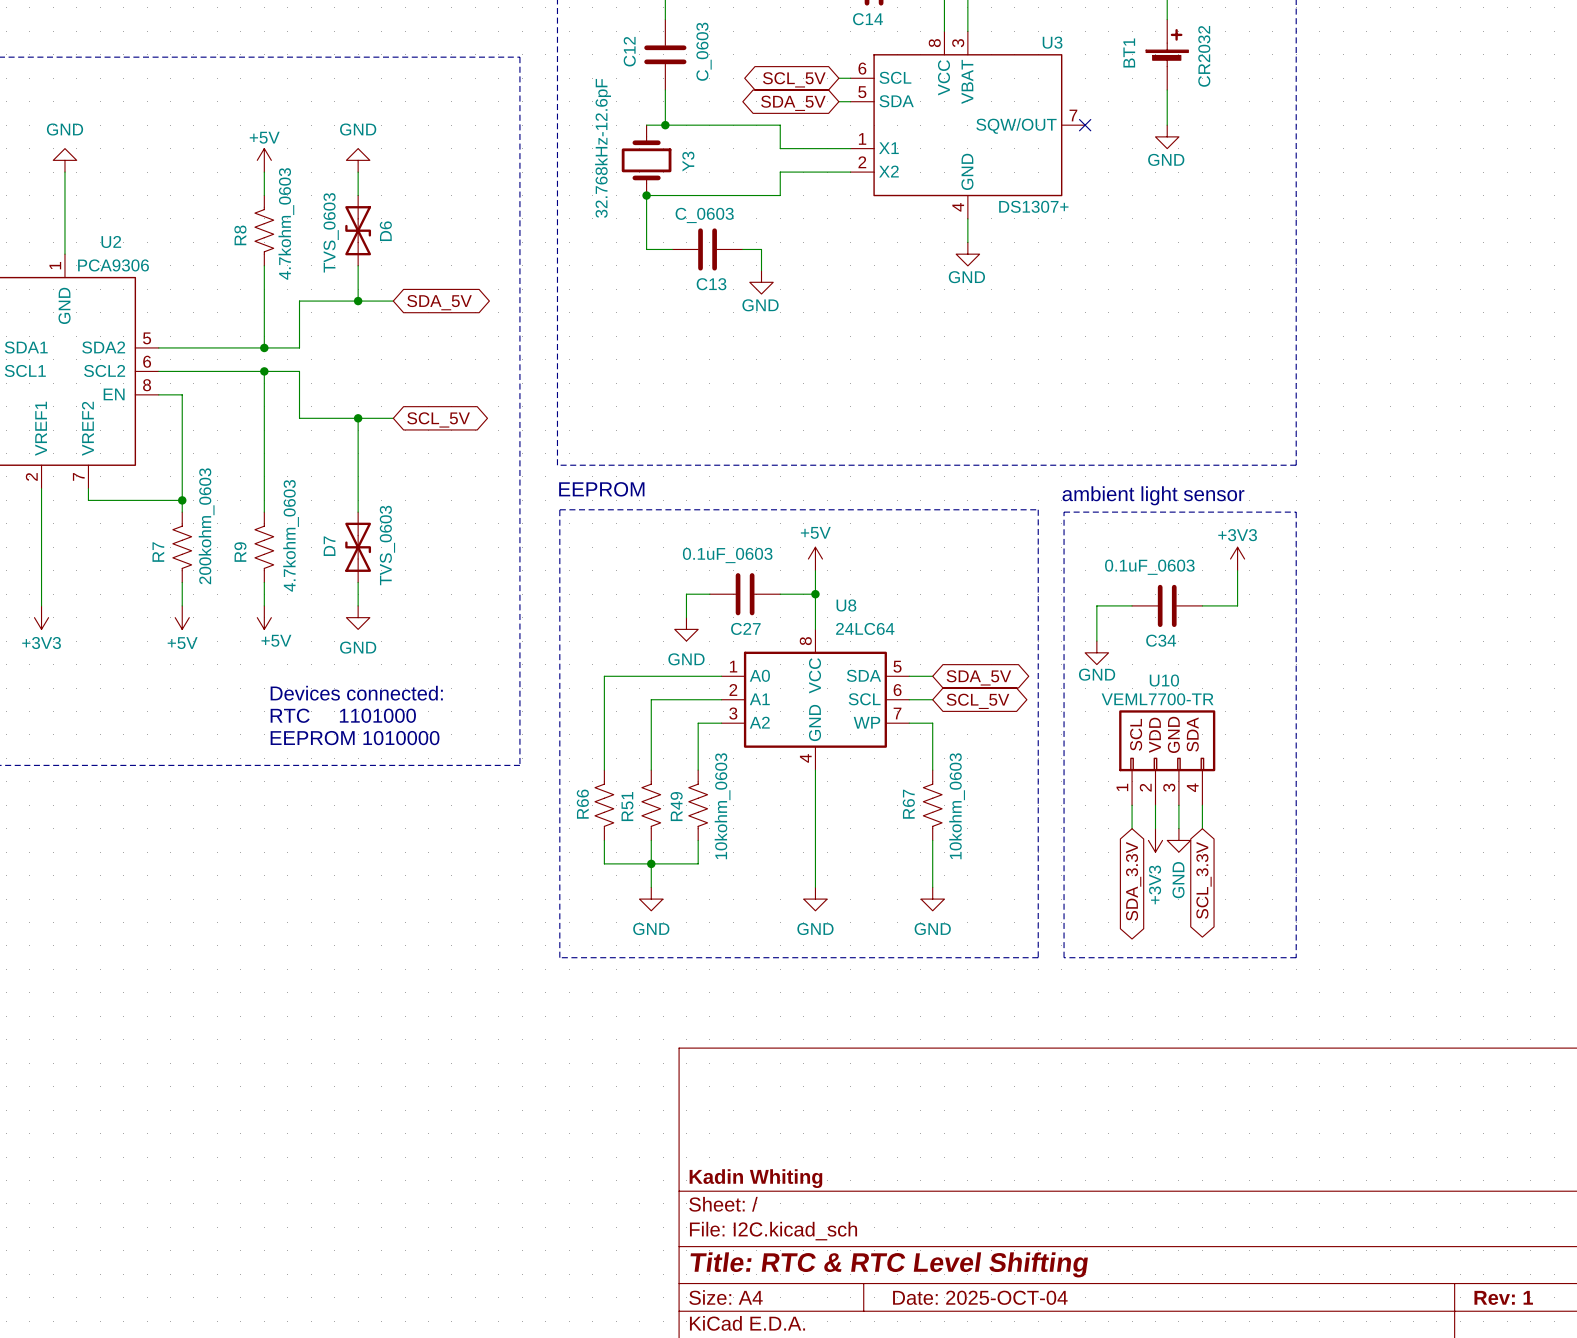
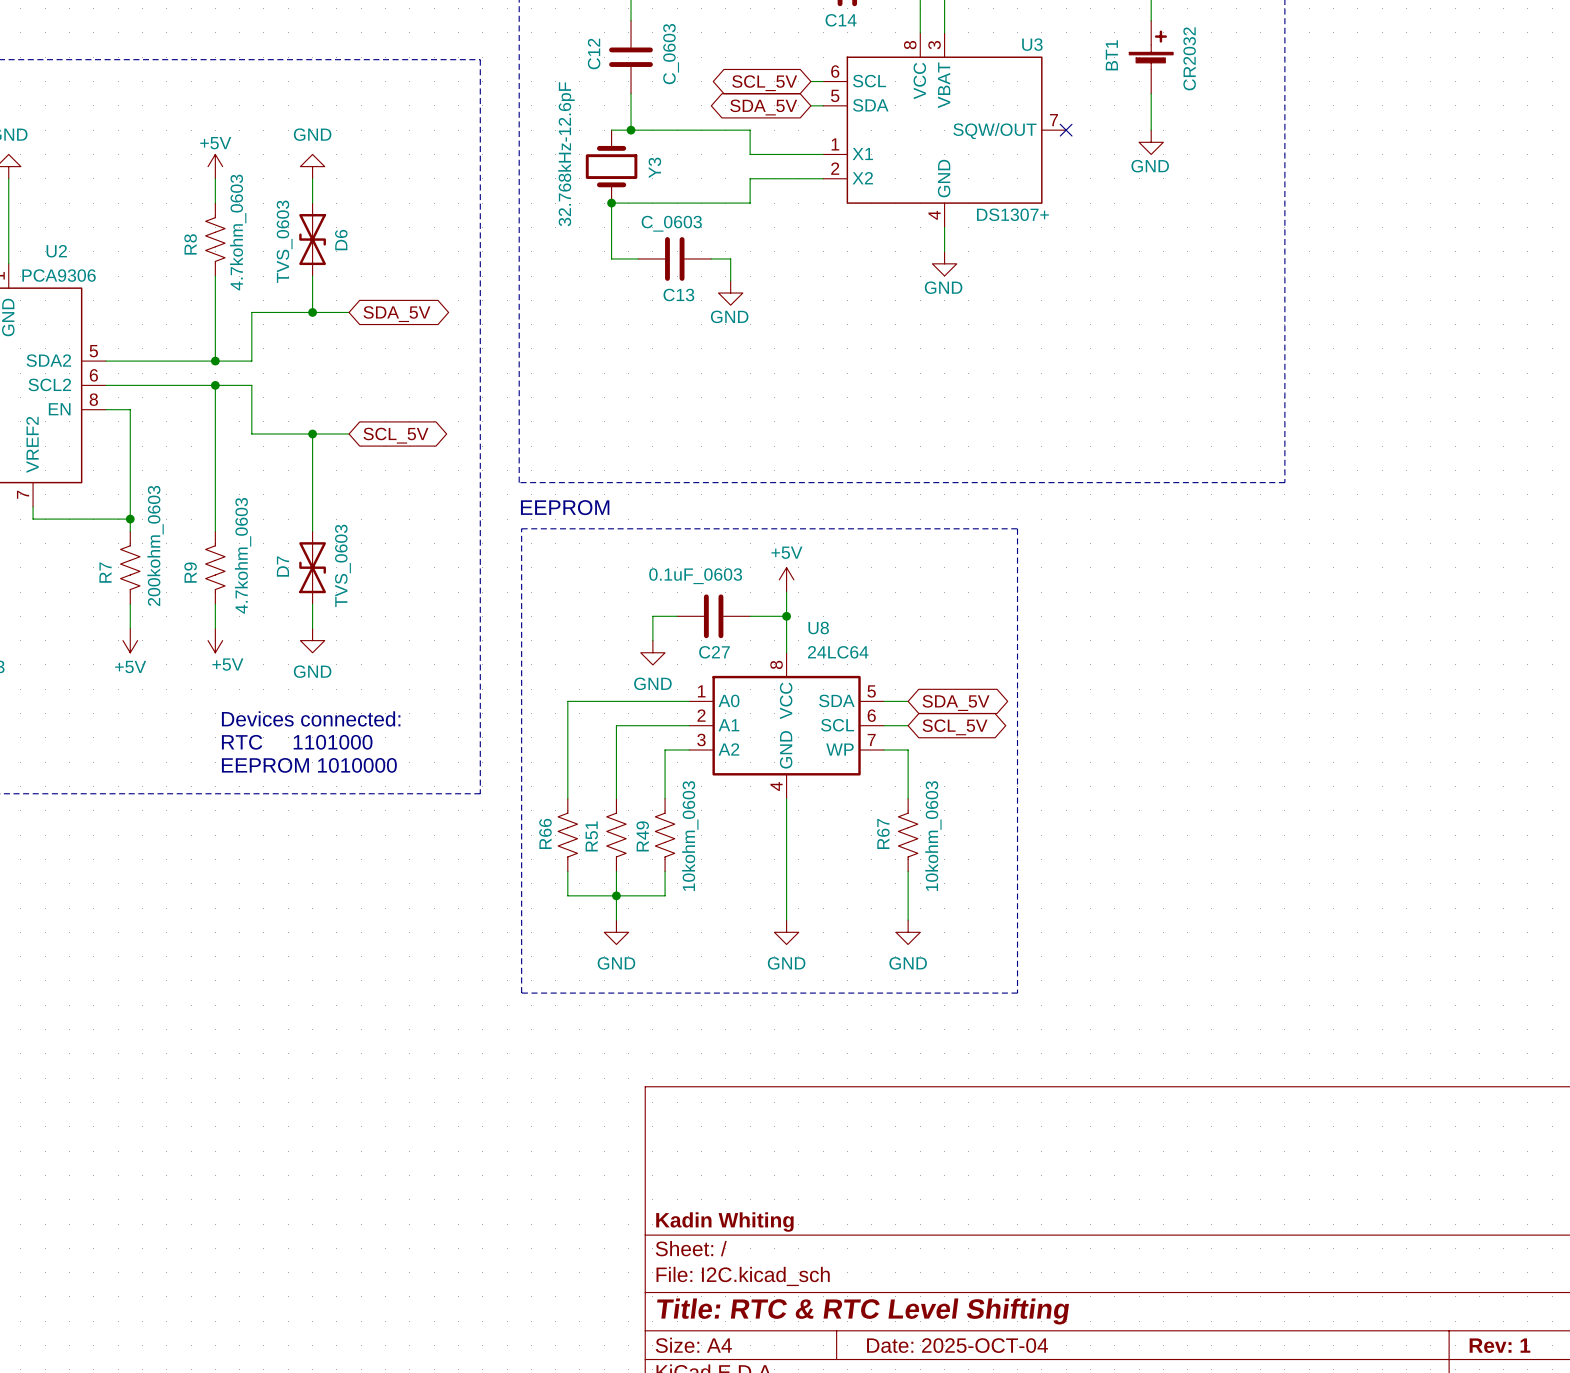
text: ambient light sensor (1153, 495) -> none
line: (1064, 512) (1296, 512) (1296, 957) (1064, 957) (1064, 512) -> none
power symbol: +3V3 (1237, 559) -> none
wire: (1237, 570) (1237, 605) (1202, 605) -> none
wire: (1132, 605) (1096, 605) (1096, 641) -> none
C34: 0.1uF_0603 (1167, 605) -> none
power symbol: GND (1096, 652) -> none
U10: VEML7700-TR (1167, 757) -> none
wire: (1132, 805) (1132, 828) -> none
wire: (1155, 805) (1155, 828) -> none
wire: (1178, 805) (1178, 828) -> none
wire: (1202, 805) (1202, 828) -> none
power symbol: +3V3 (1155, 840) -> none
power symbol: GND (1178, 840) -> none
global label: SCL_3.3V (1204, 880) -> none
global label: SDA_3.3V (1133, 881) -> none

